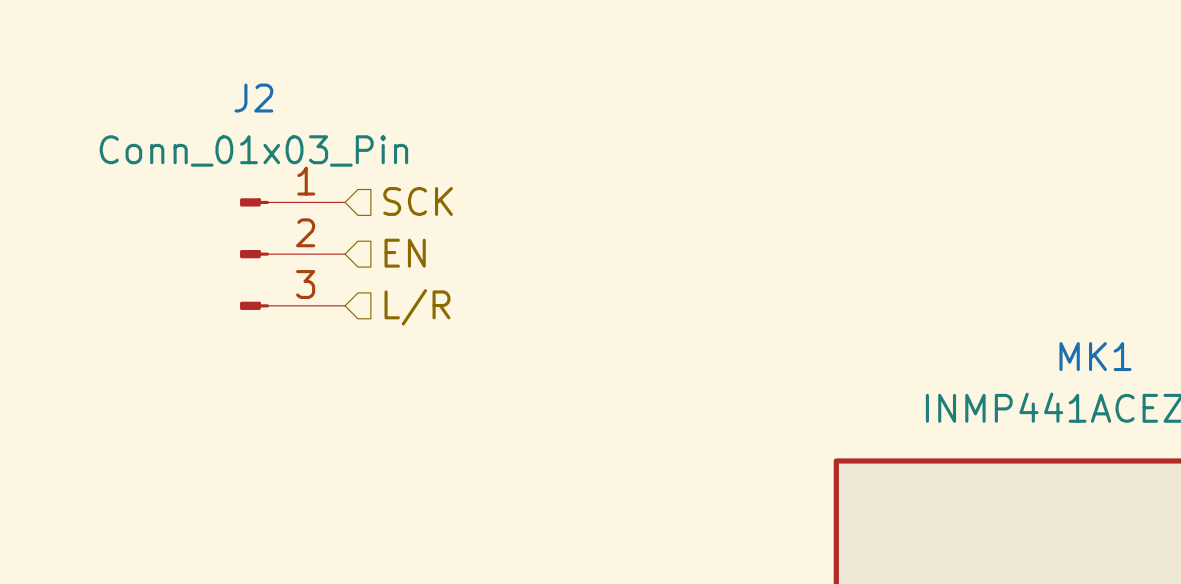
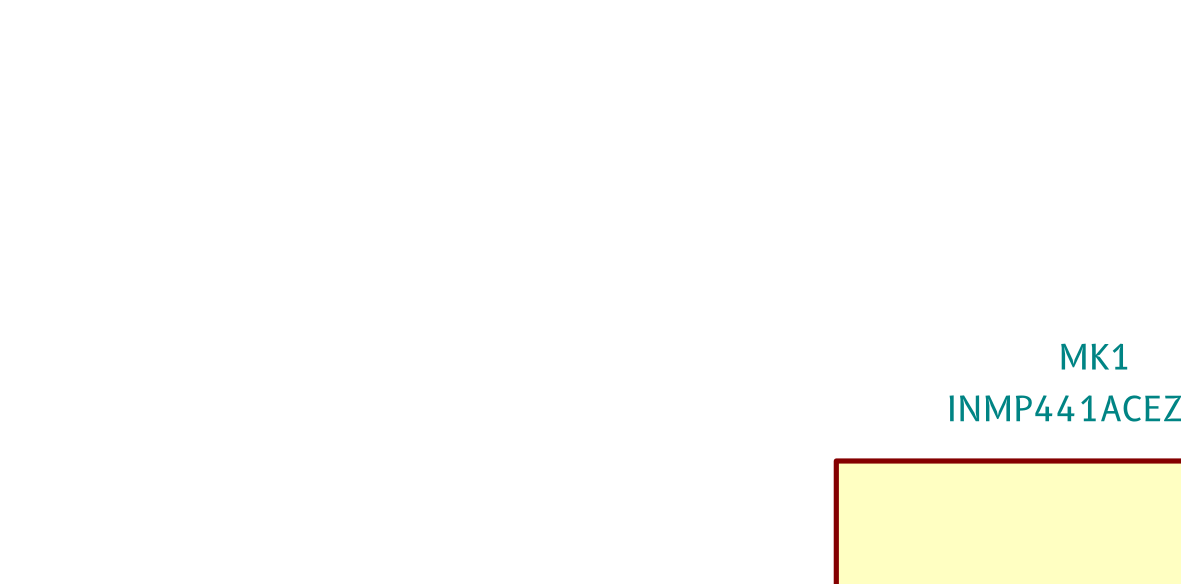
hierarchical label: SCK (418, 201) -> none
hierarchical label: EN (405, 253) -> none
J2: Conn_01x03_Pin (292, 254) -> none
hierarchical label: L/R (417, 307) -> none

